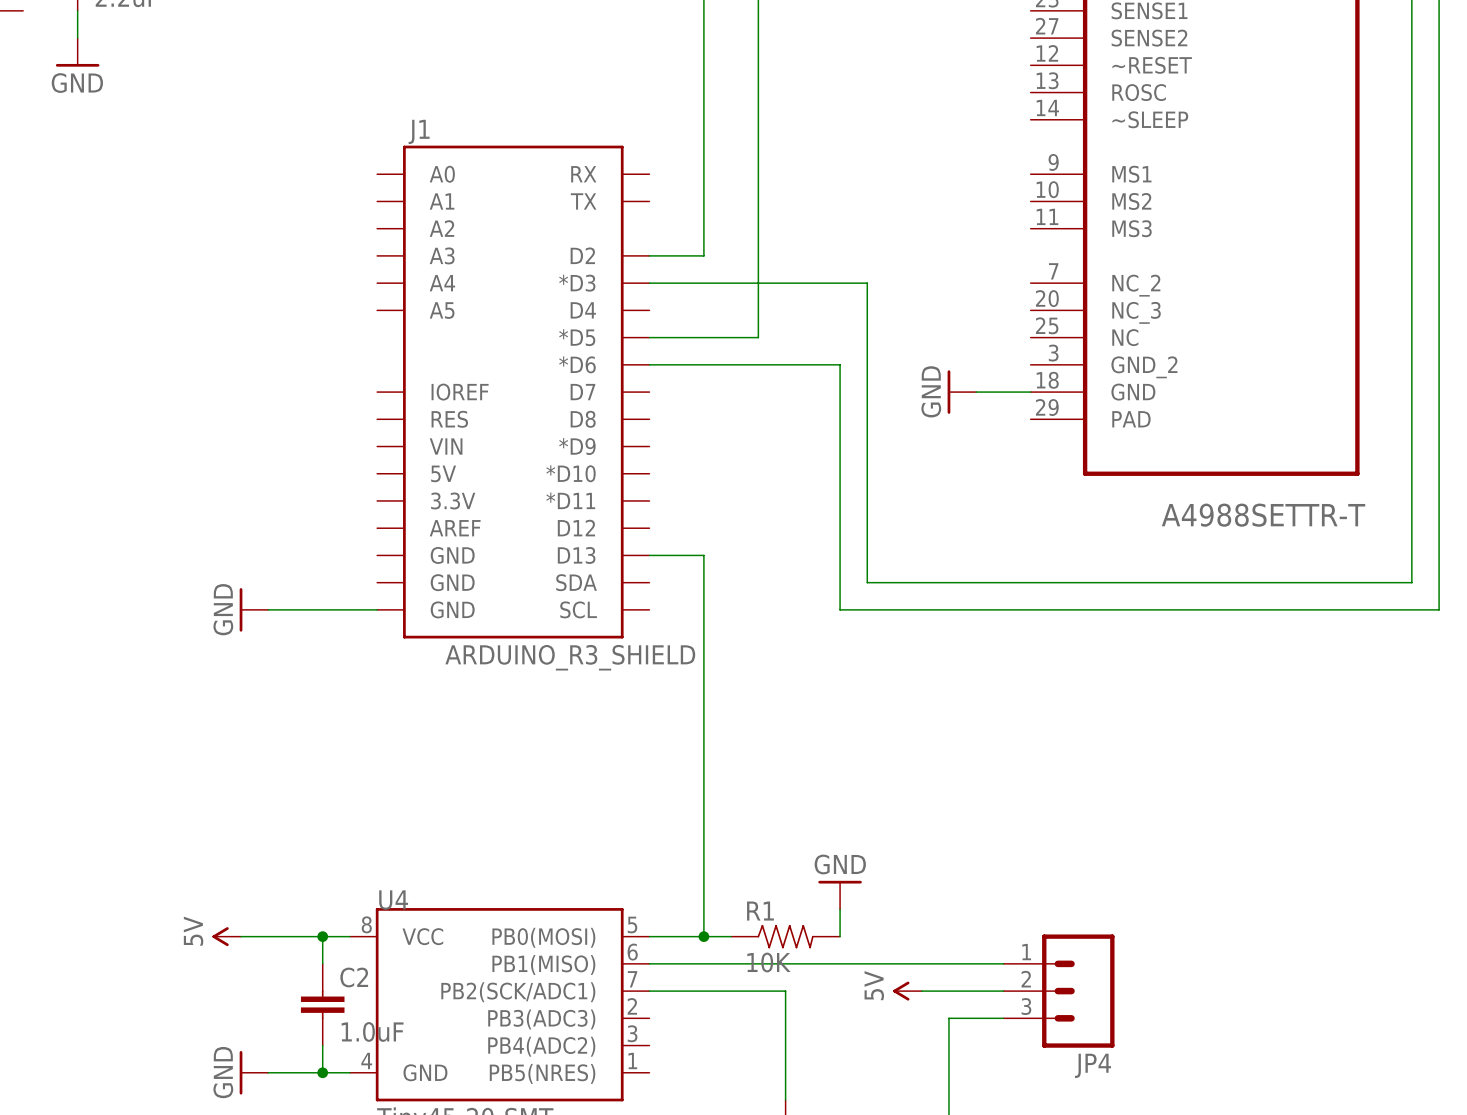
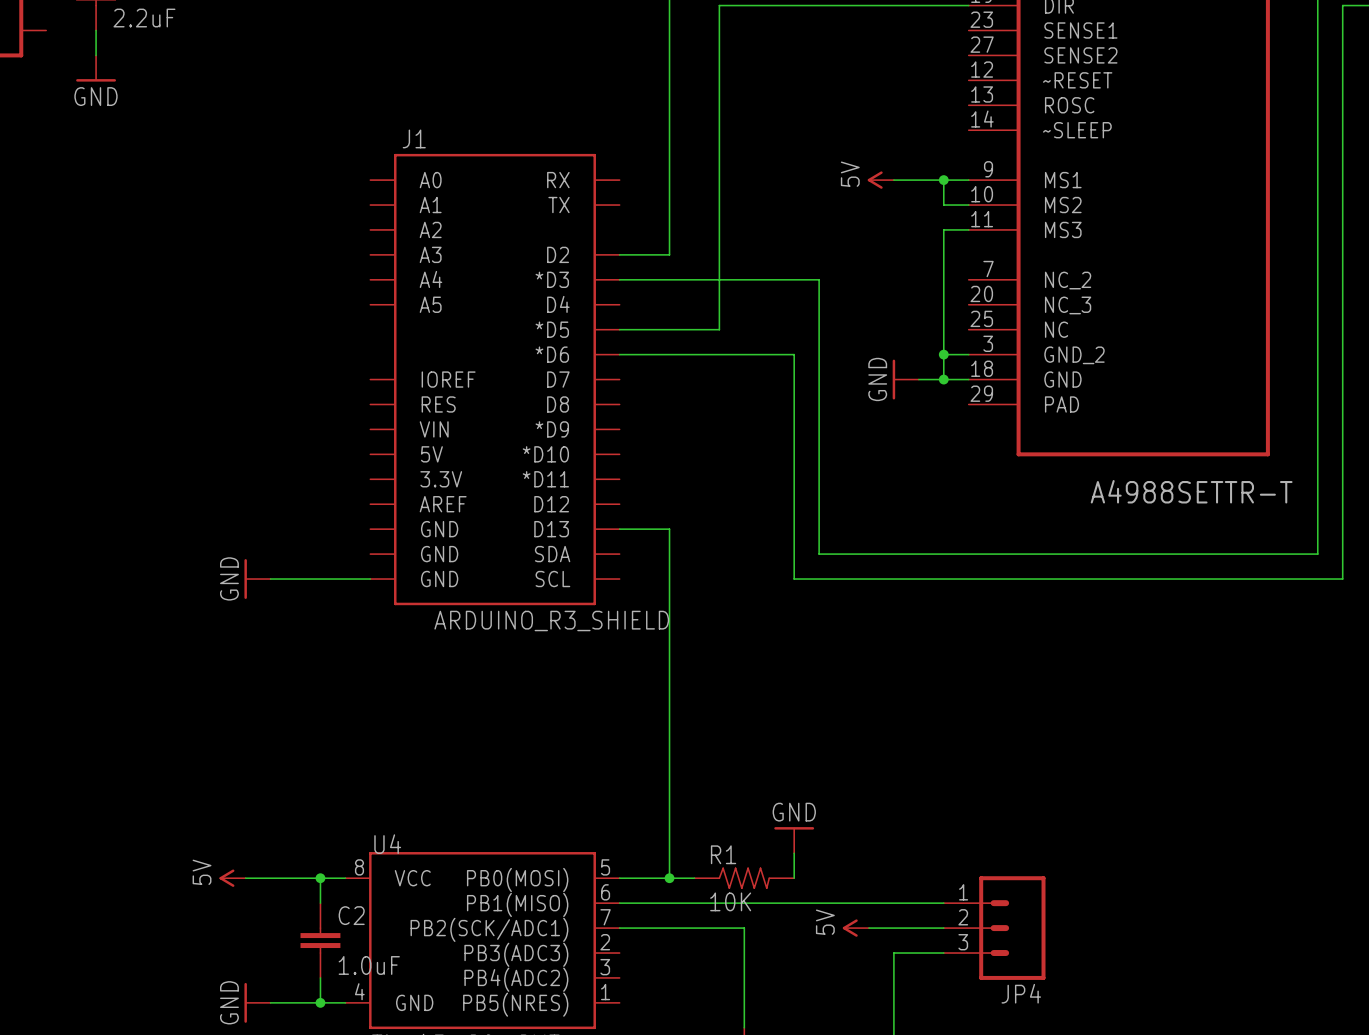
power symbol: none -> 5V (880, 180)
wire: none -> (893, 180) (968, 180)
wire: none -> (943, 180) (943, 205) (968, 205)
junction: none -> (943, 180)
wire: none -> (968, 229) (943, 229) (943, 379)
wire: none -> (943, 354) (968, 354)
junction: none -> (943, 354)
junction: none -> (943, 379)

